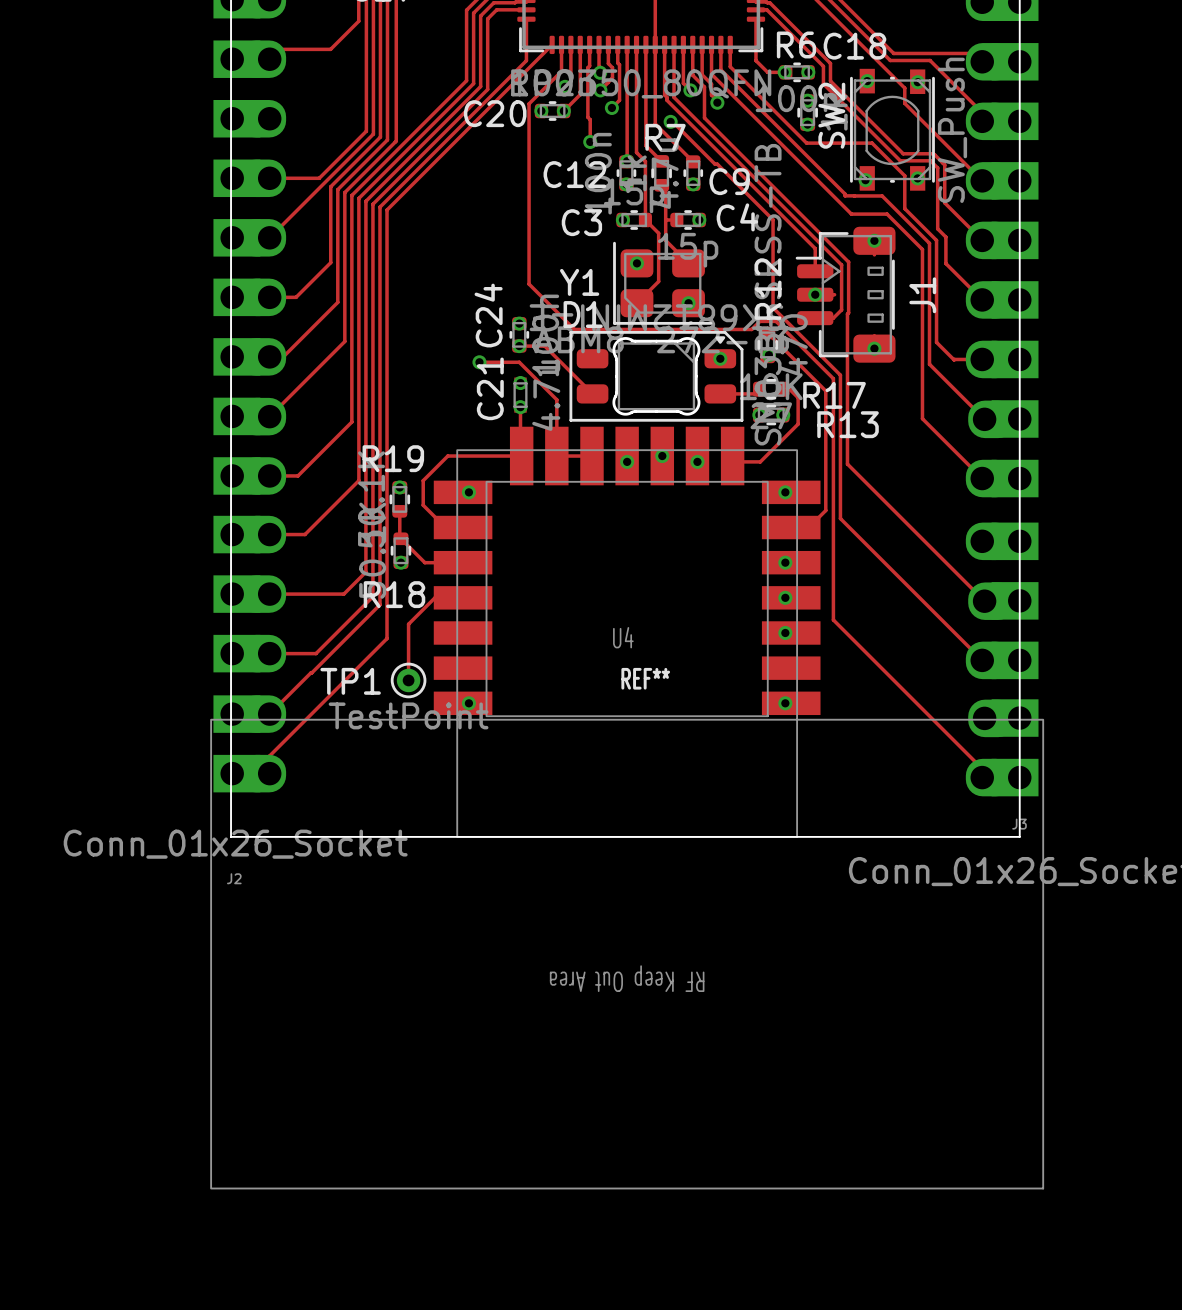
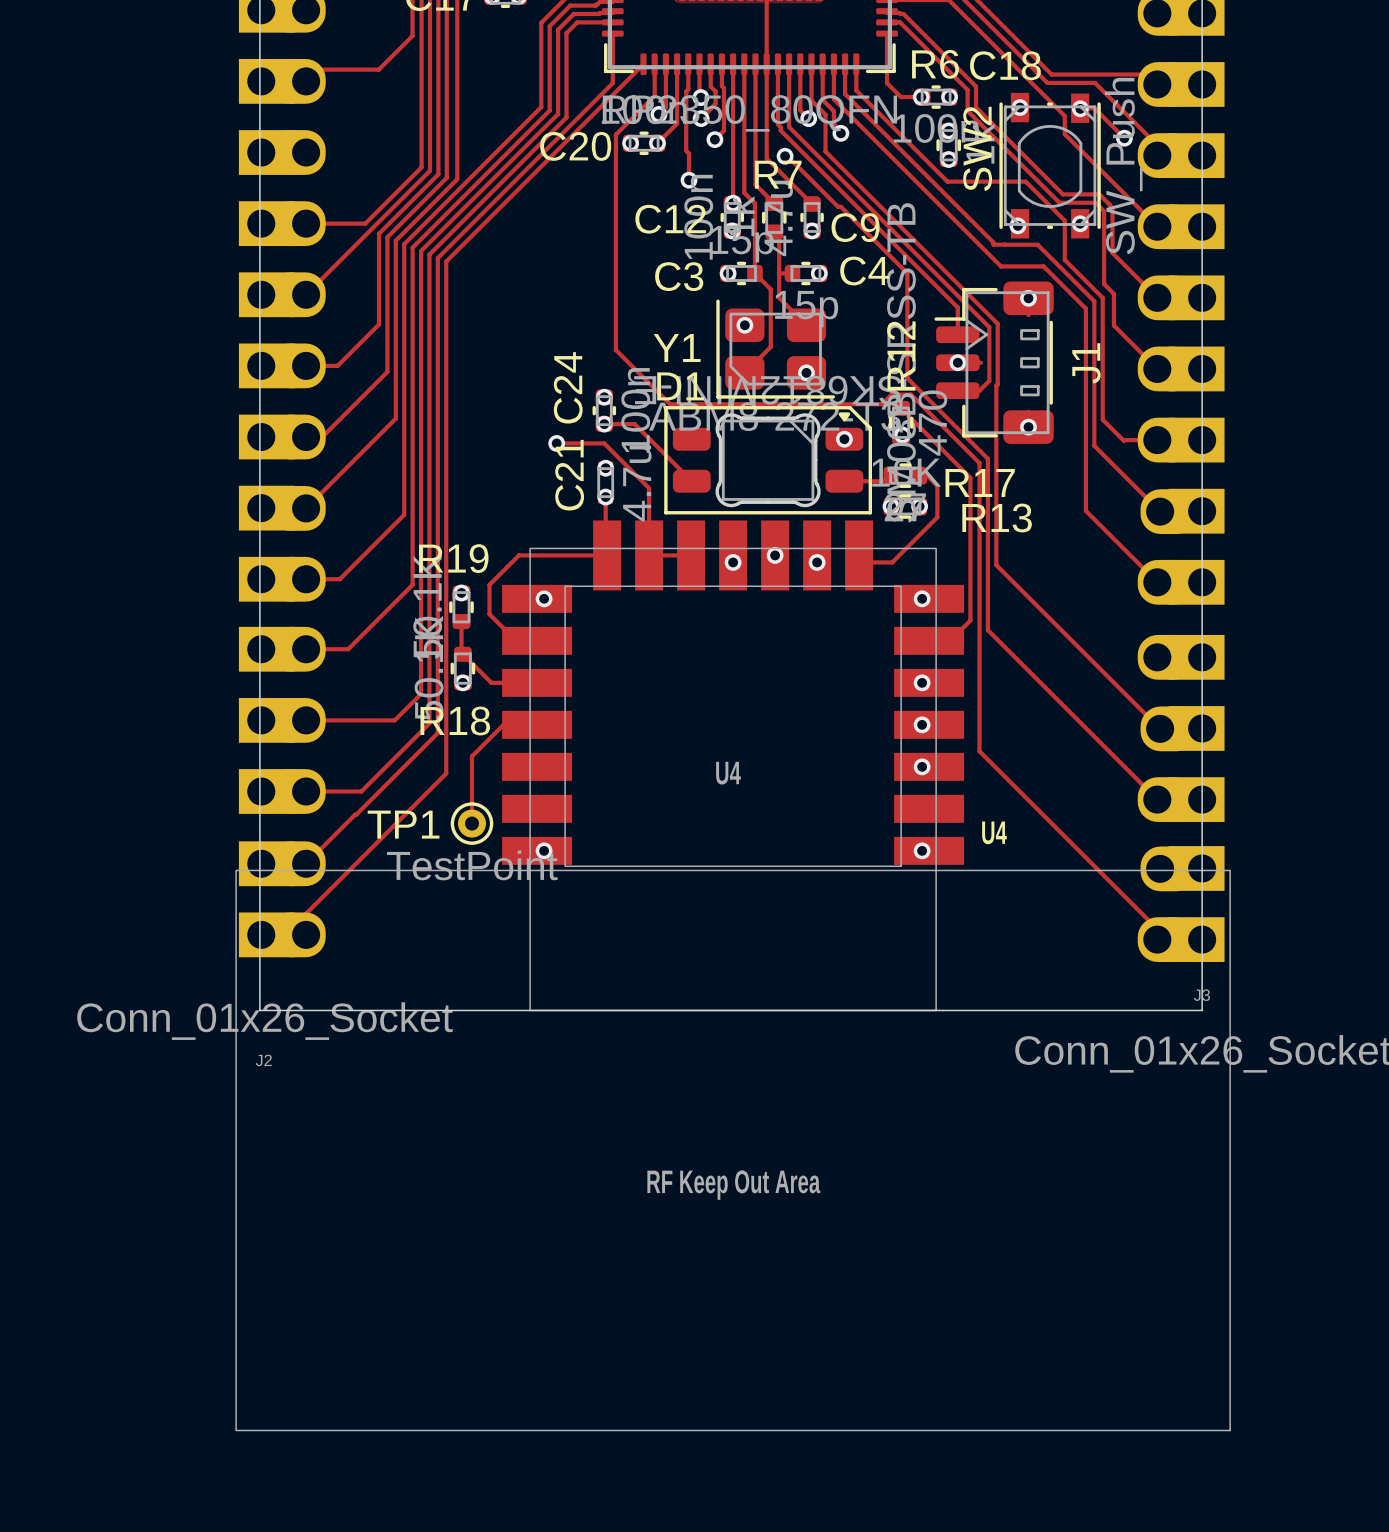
track: none -> (1080, 108) (1094, 108) (1124, 138)
via: none -> (1124, 138)
U4 footprint: [210, 426, 1044, 1189] -> [235, 520, 1231, 1431]

